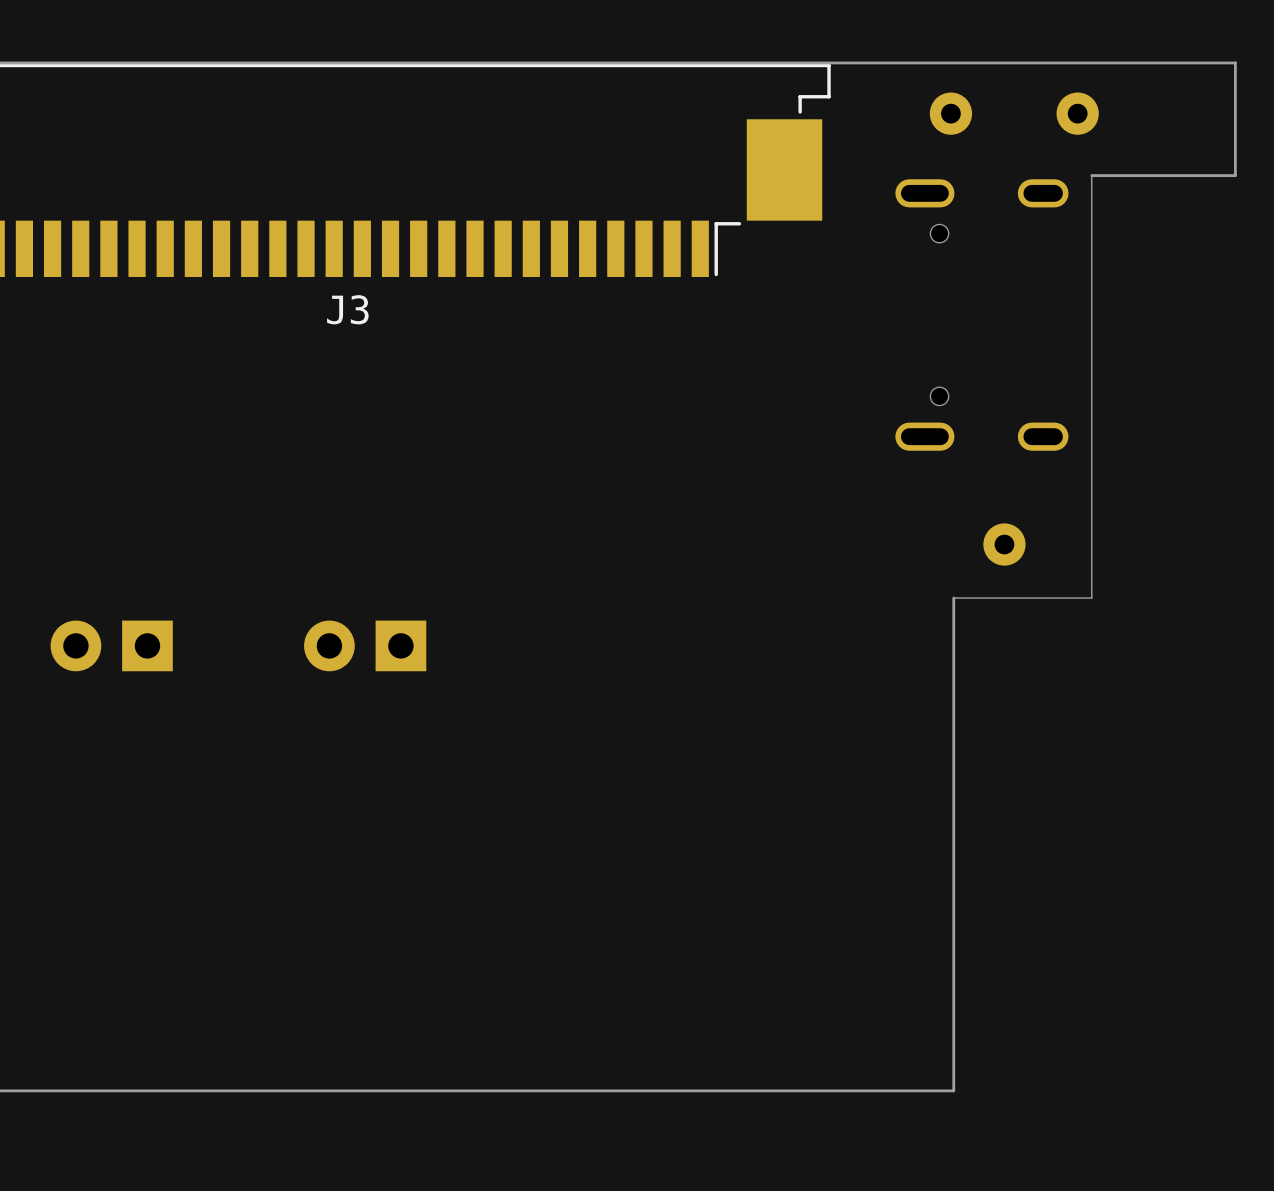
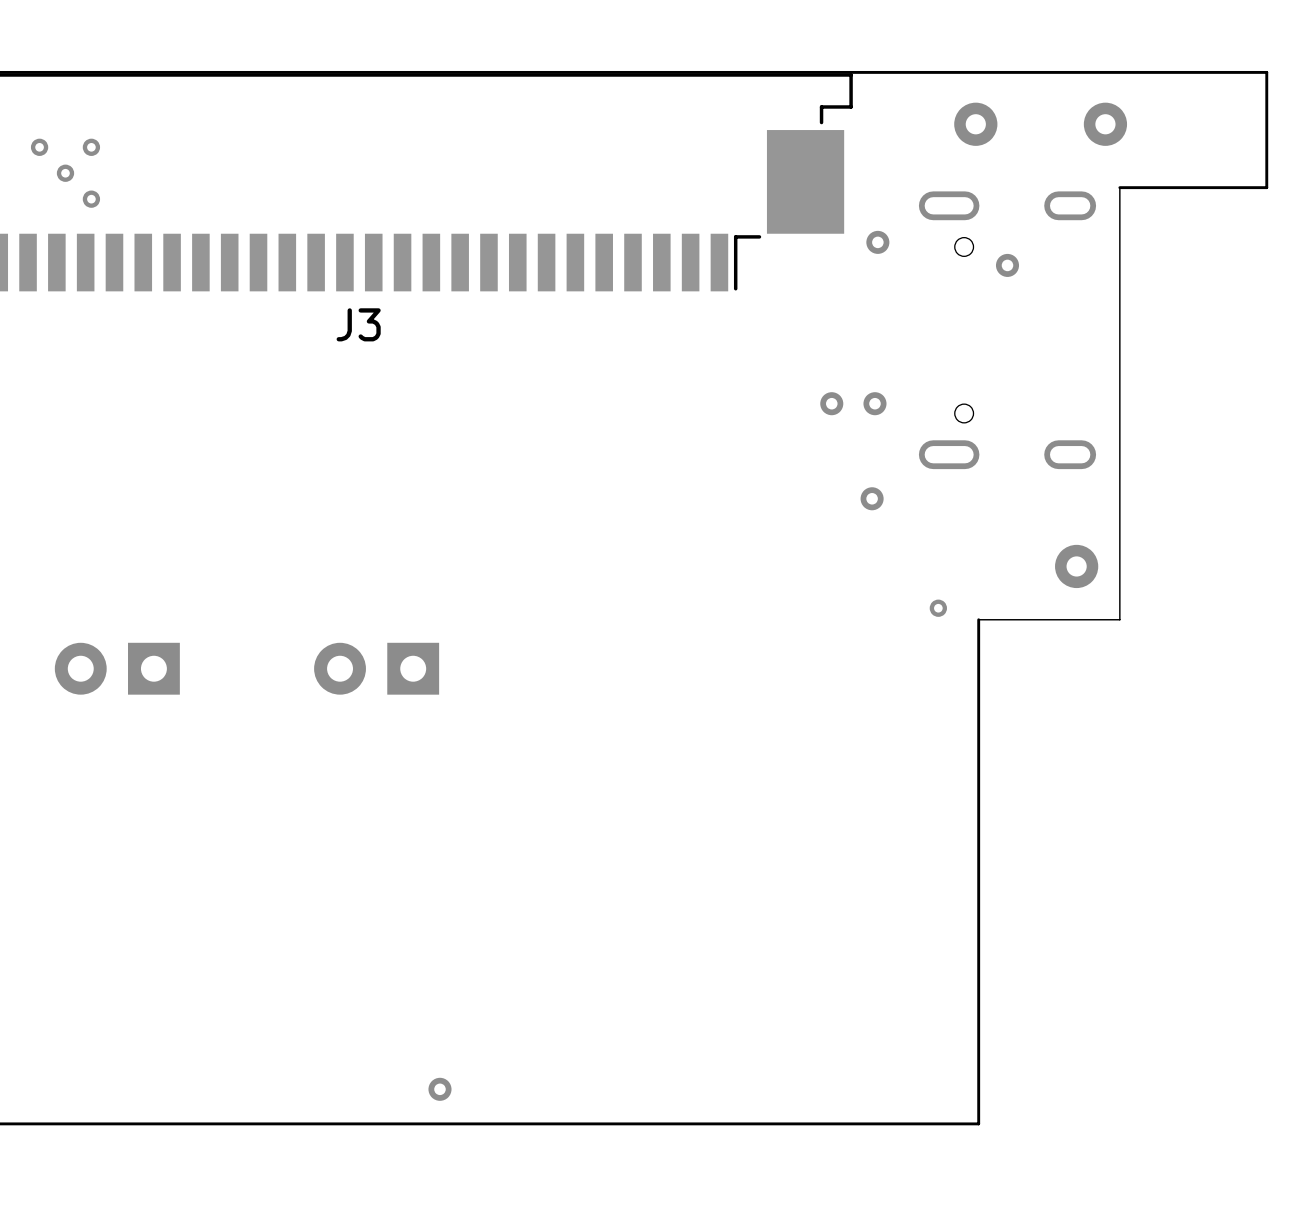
via: none -> (39, 147)
via: none -> (91, 147)
via: none -> (65, 173)
via: none -> (91, 199)
via: none -> (877, 242)
via: none -> (1007, 265)
via: none -> (831, 403)
via: none -> (874, 403)
via: none -> (872, 498)
part position: (1004, 544) -> (1076, 566)
via: none -> (938, 608)
via: none -> (439, 1089)

